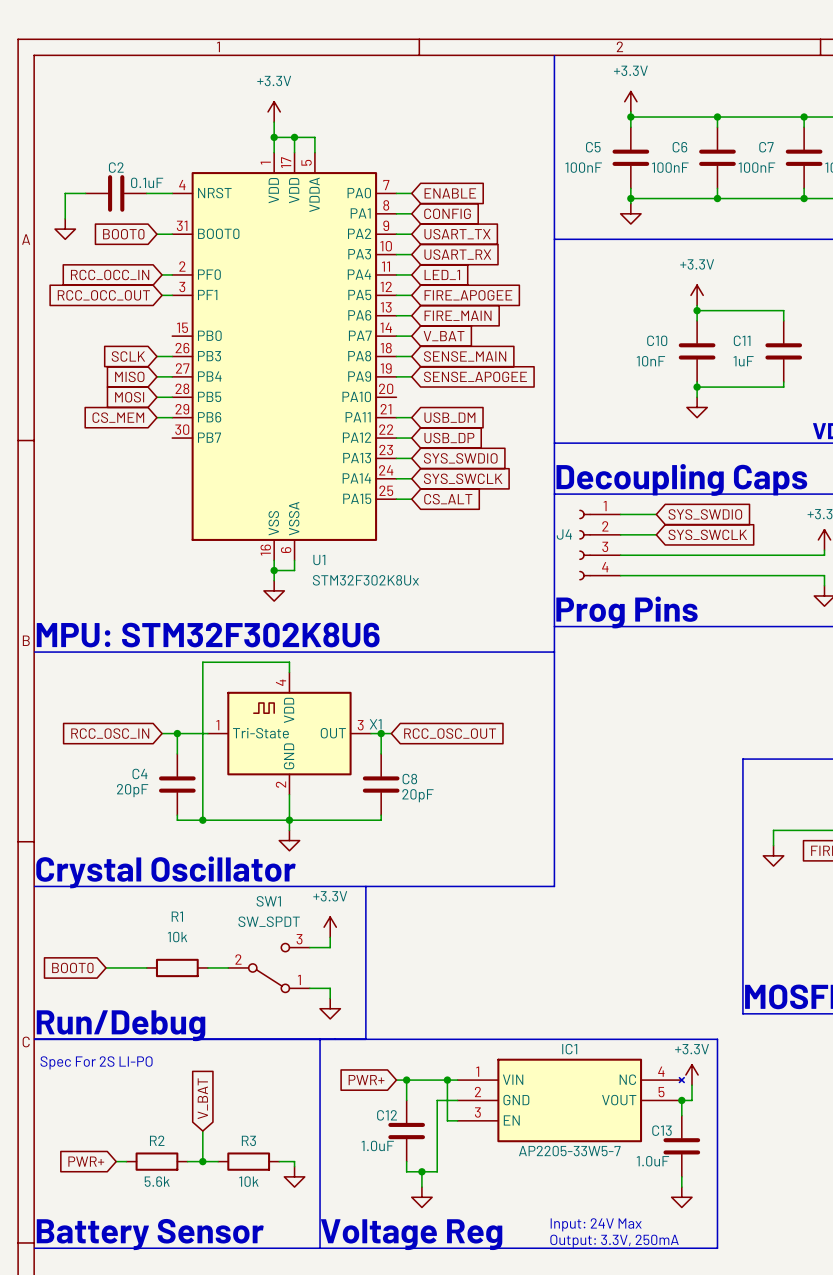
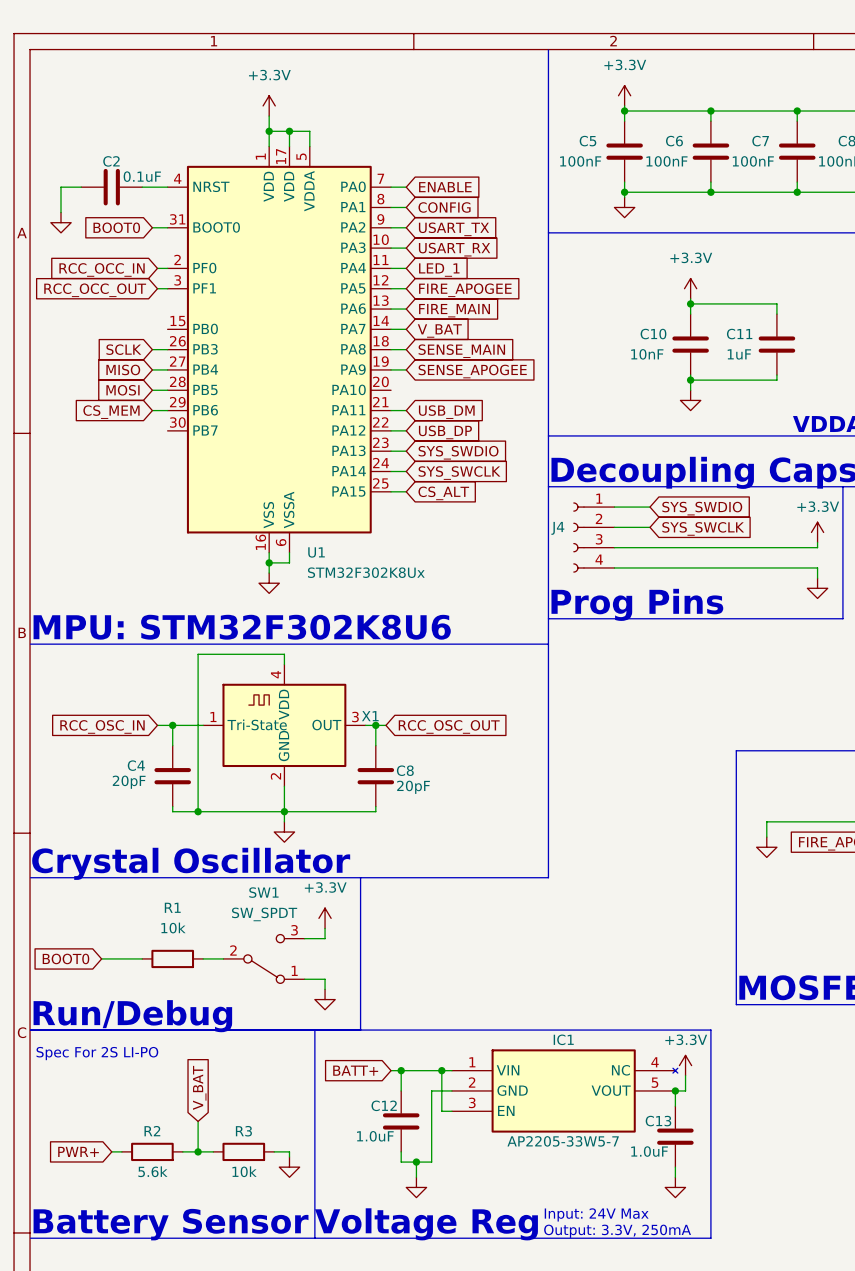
global label: PWR+ (366, 1080) -> BATT+ (355, 1070)

